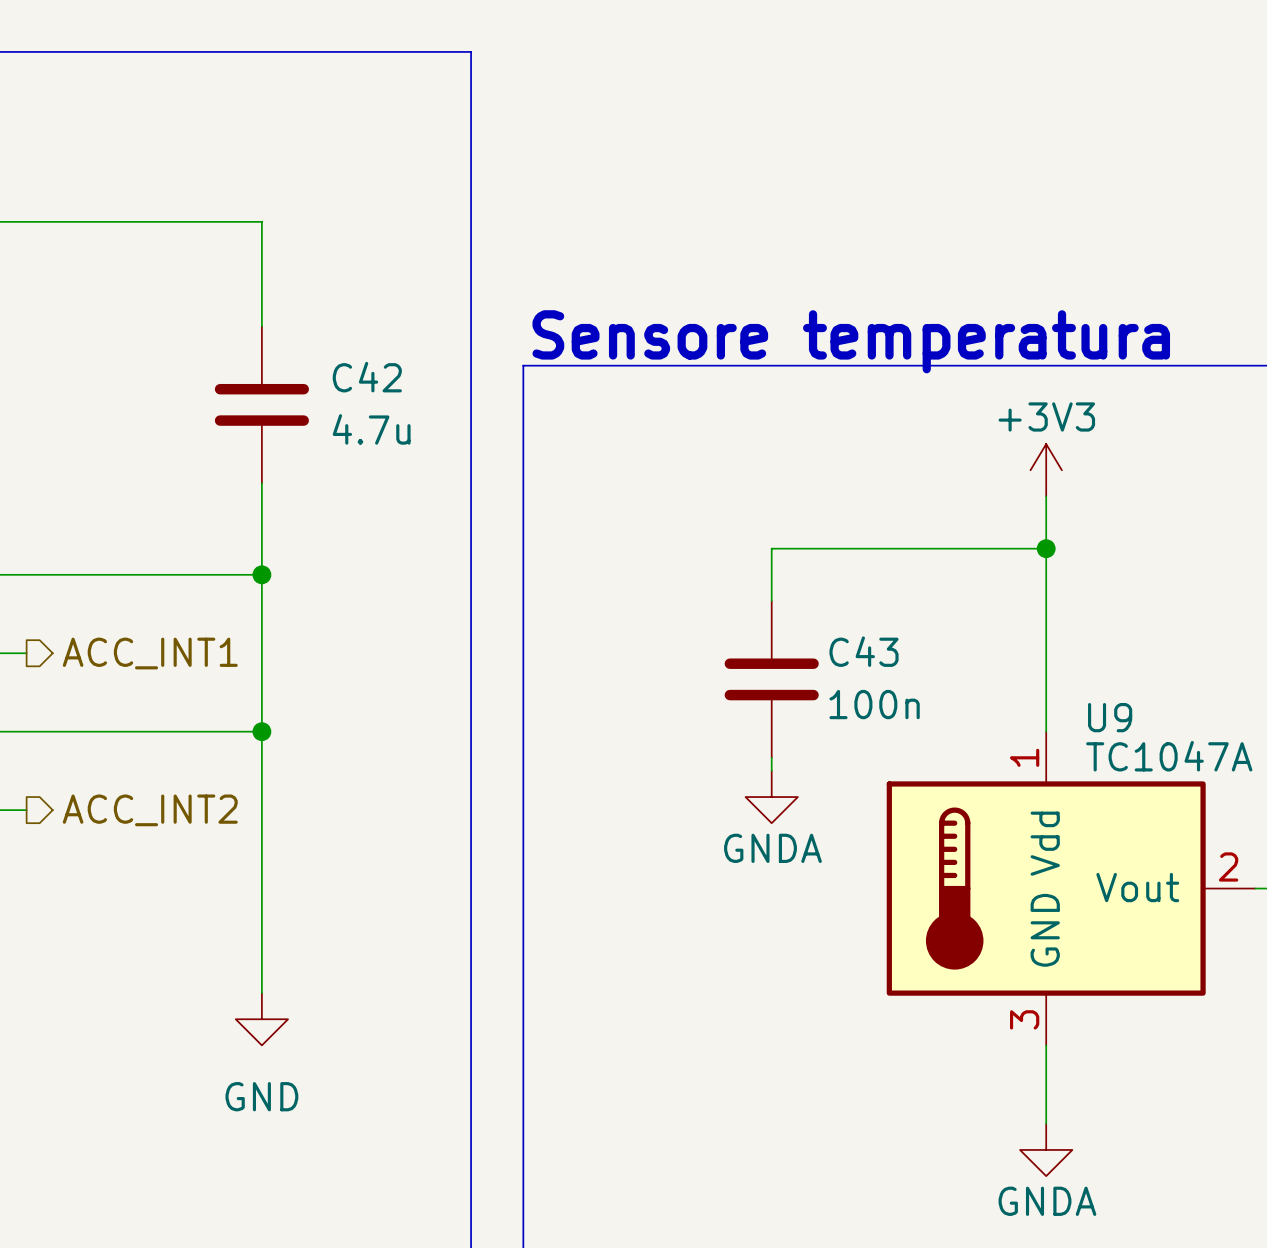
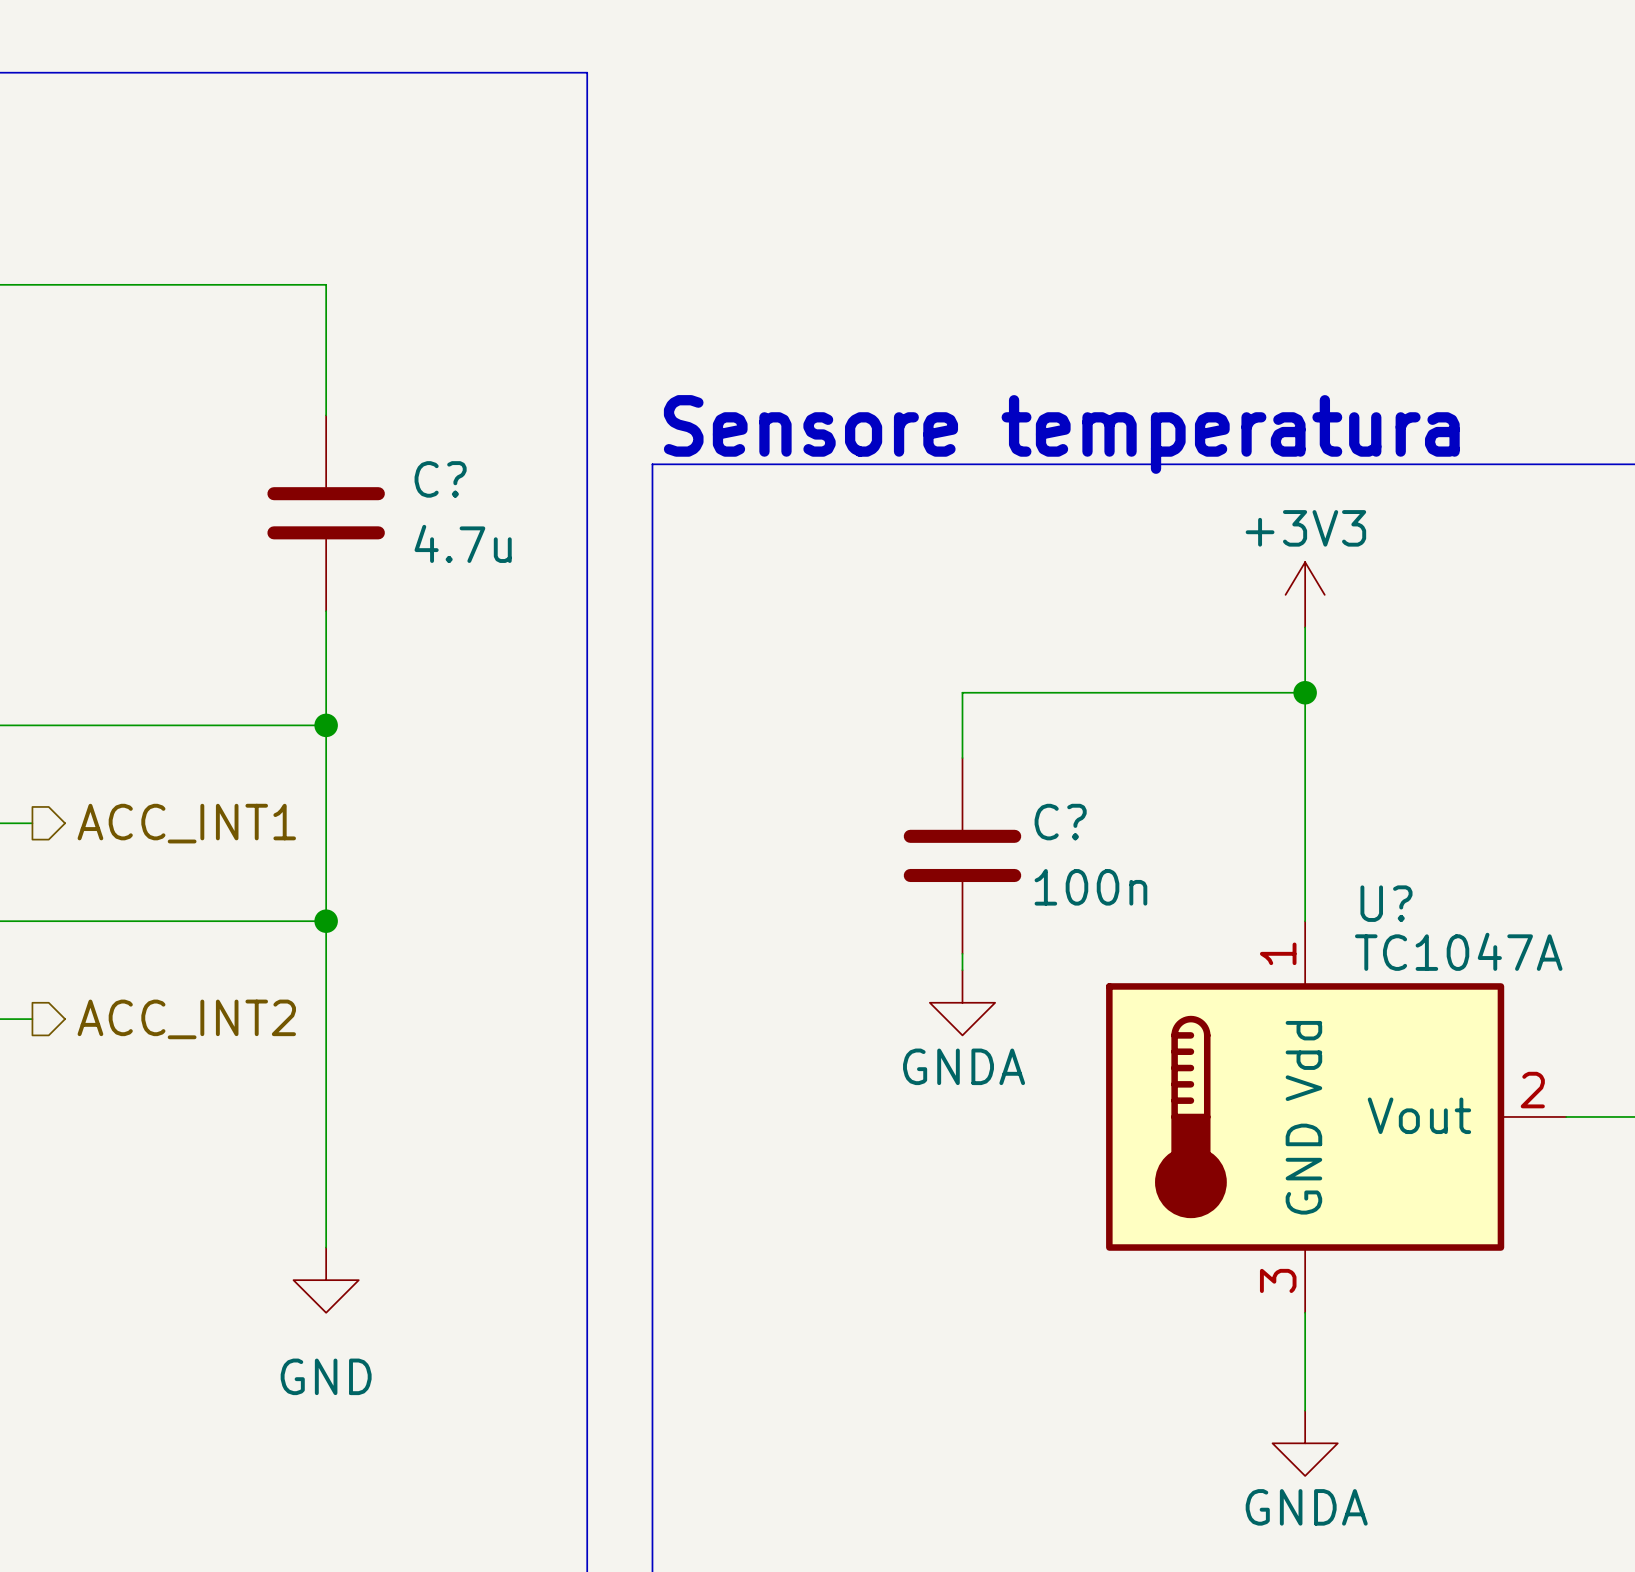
C42 name: C42 (367, 377) -> C? (440, 479)
C43 name: C43 (864, 651) -> C? (1060, 822)
U9 name: U9 (1110, 717) -> U? (1386, 903)

